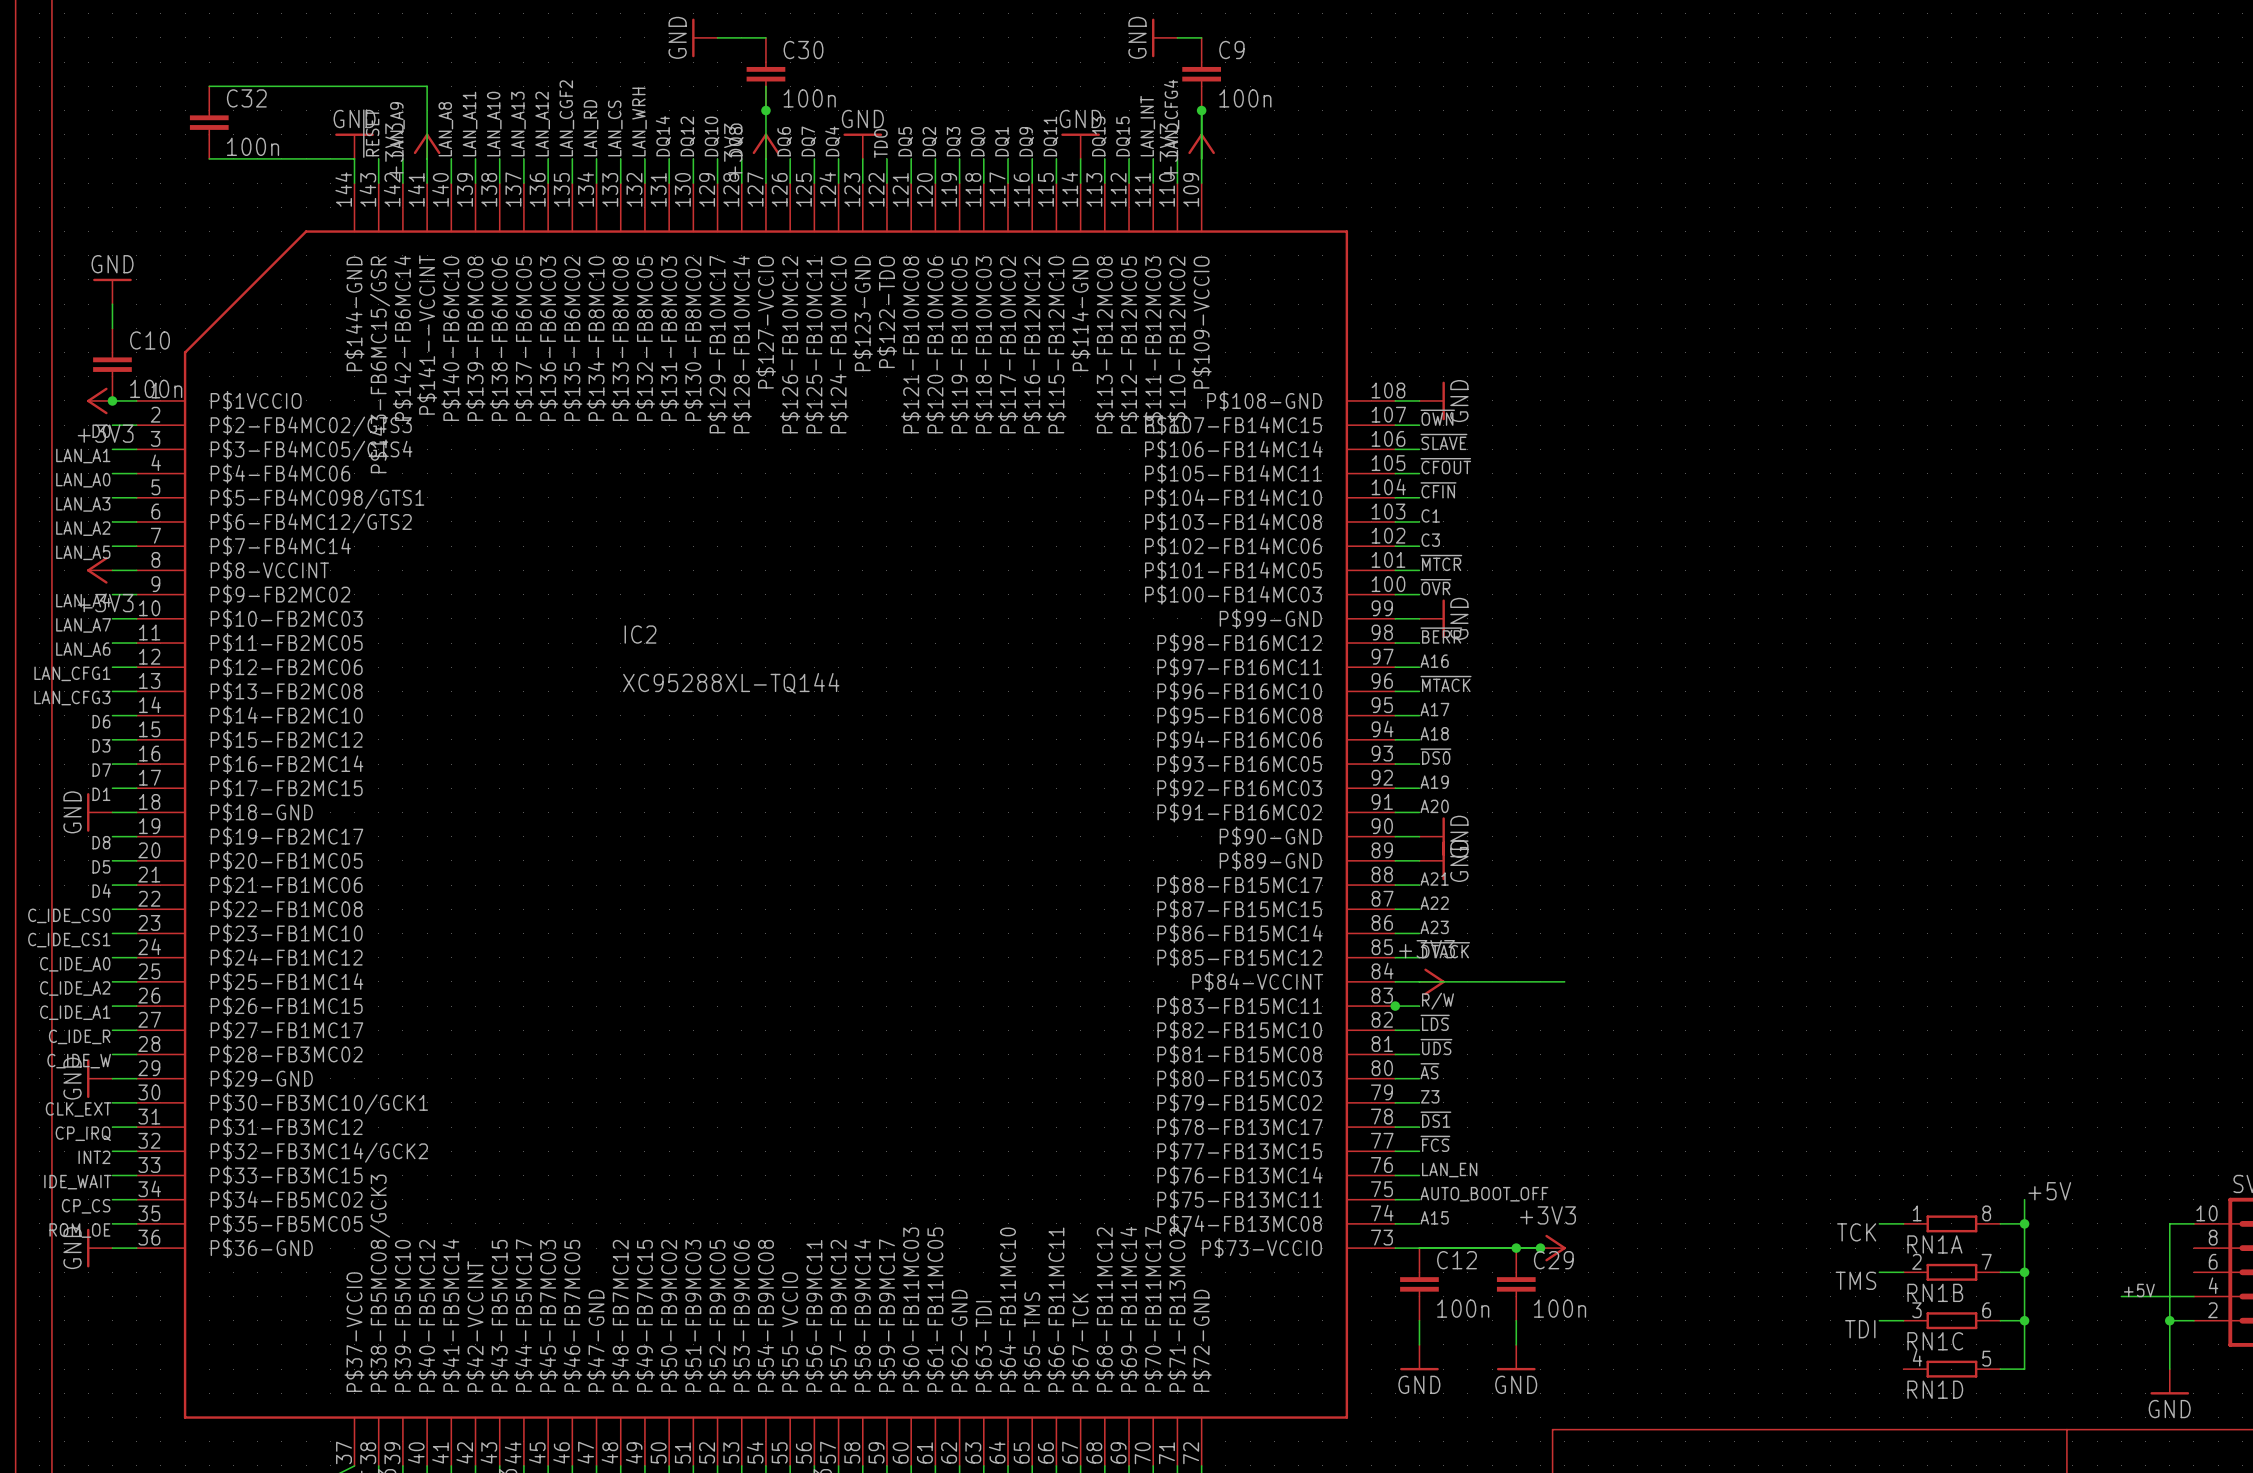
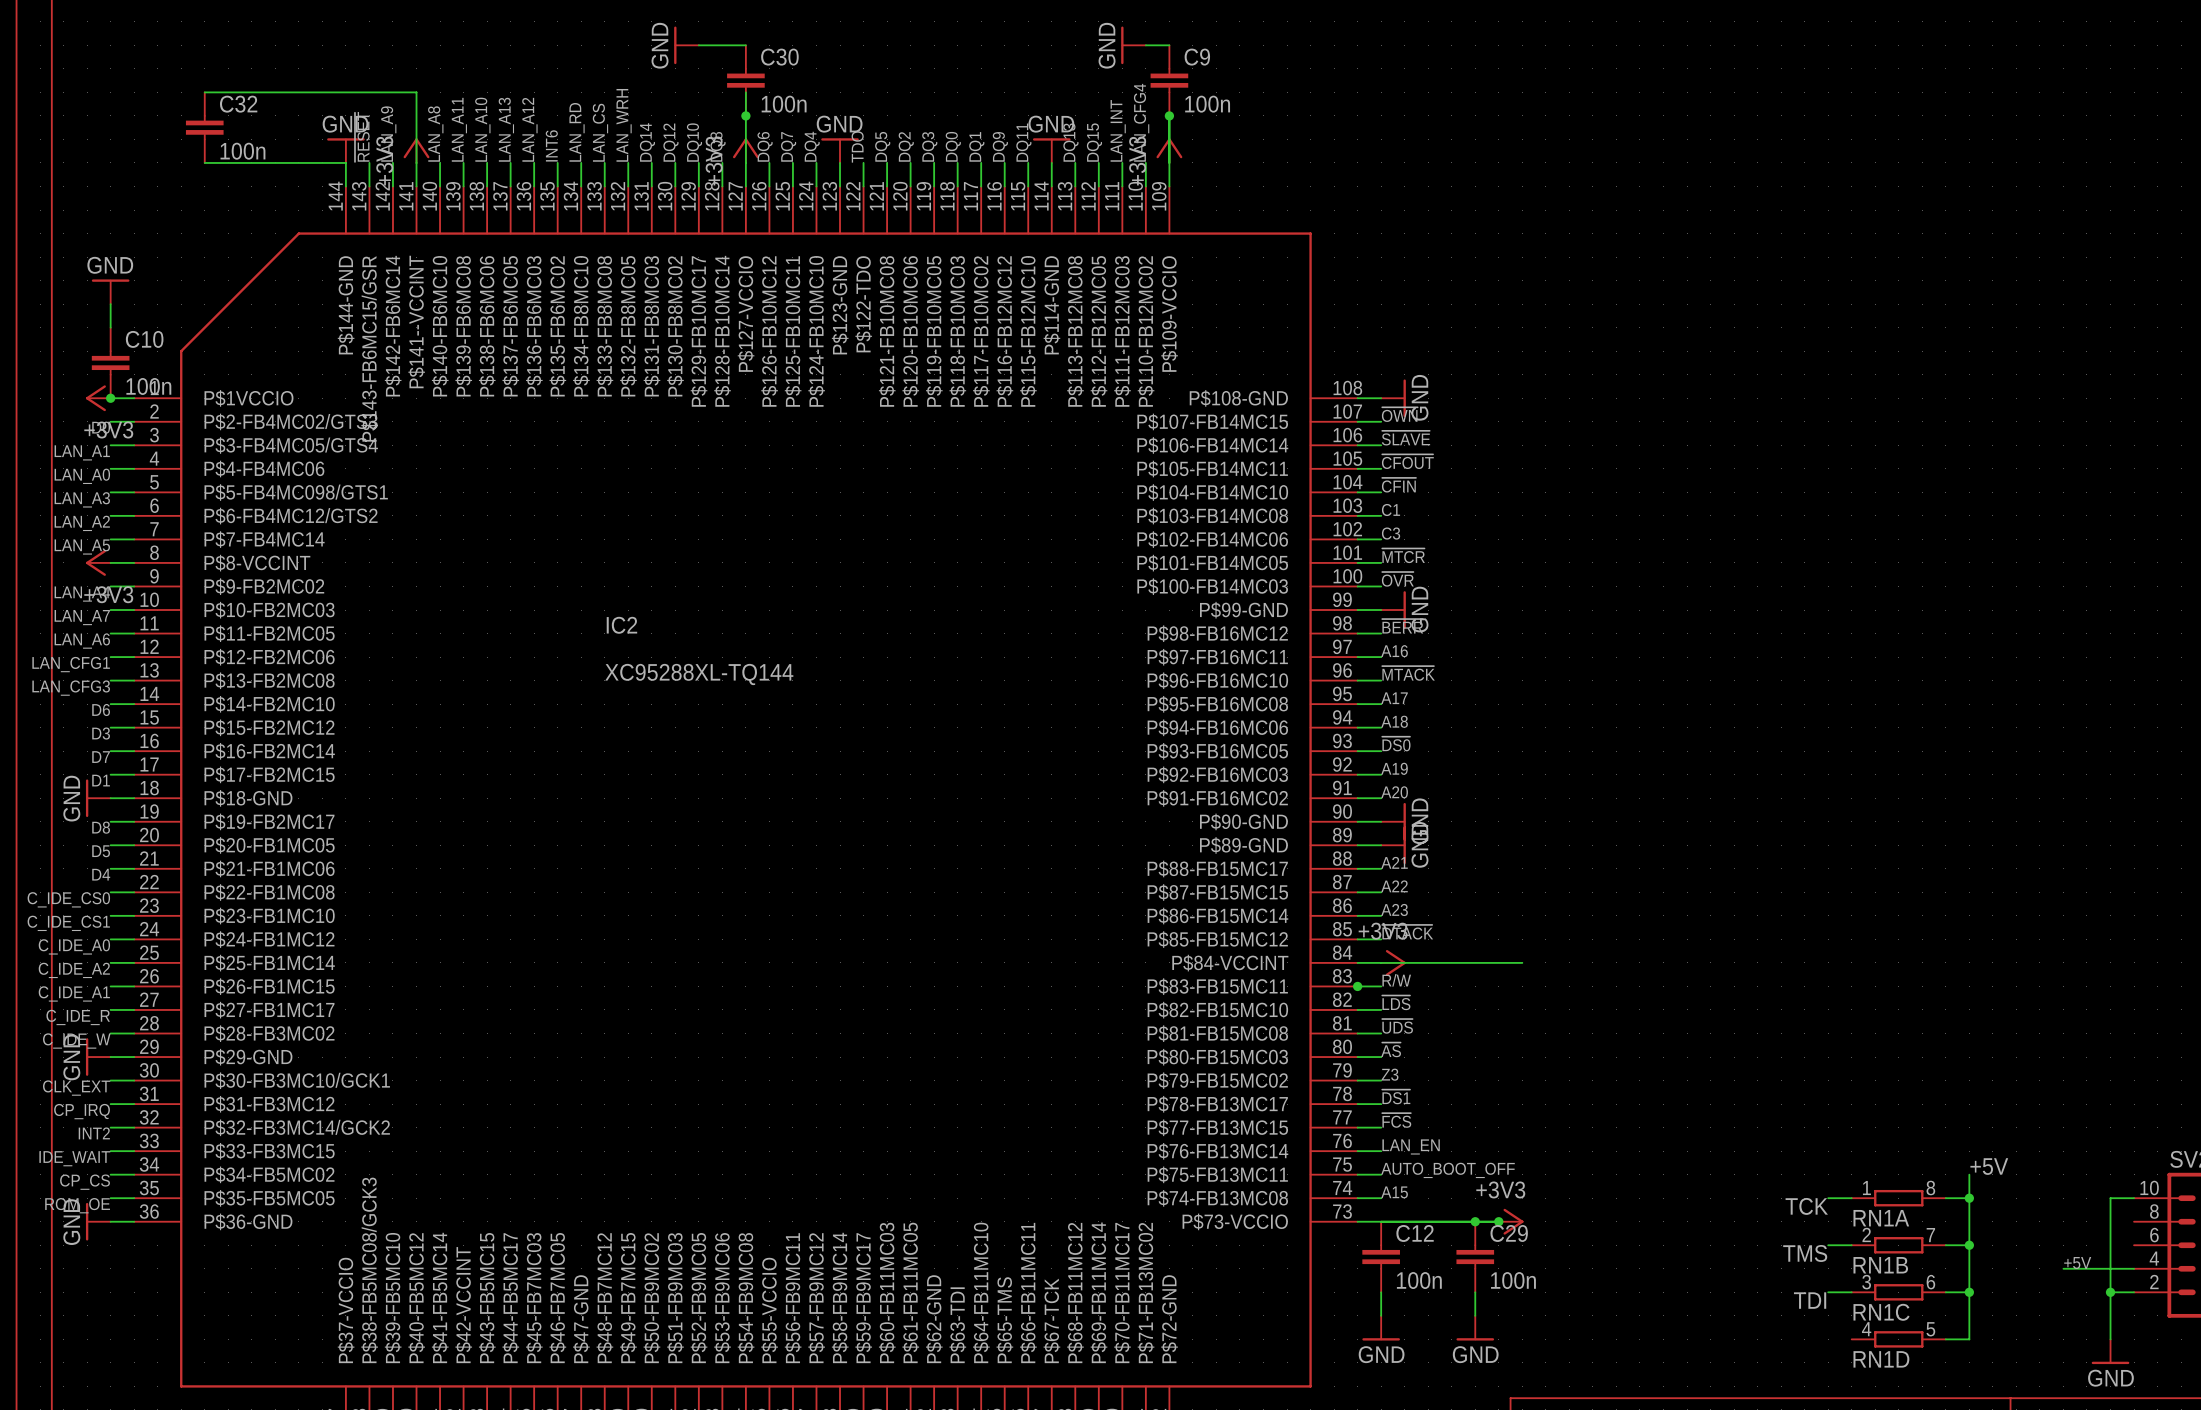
label: LAN_CGF2 (566, 118) -> INT6 (551, 145)

